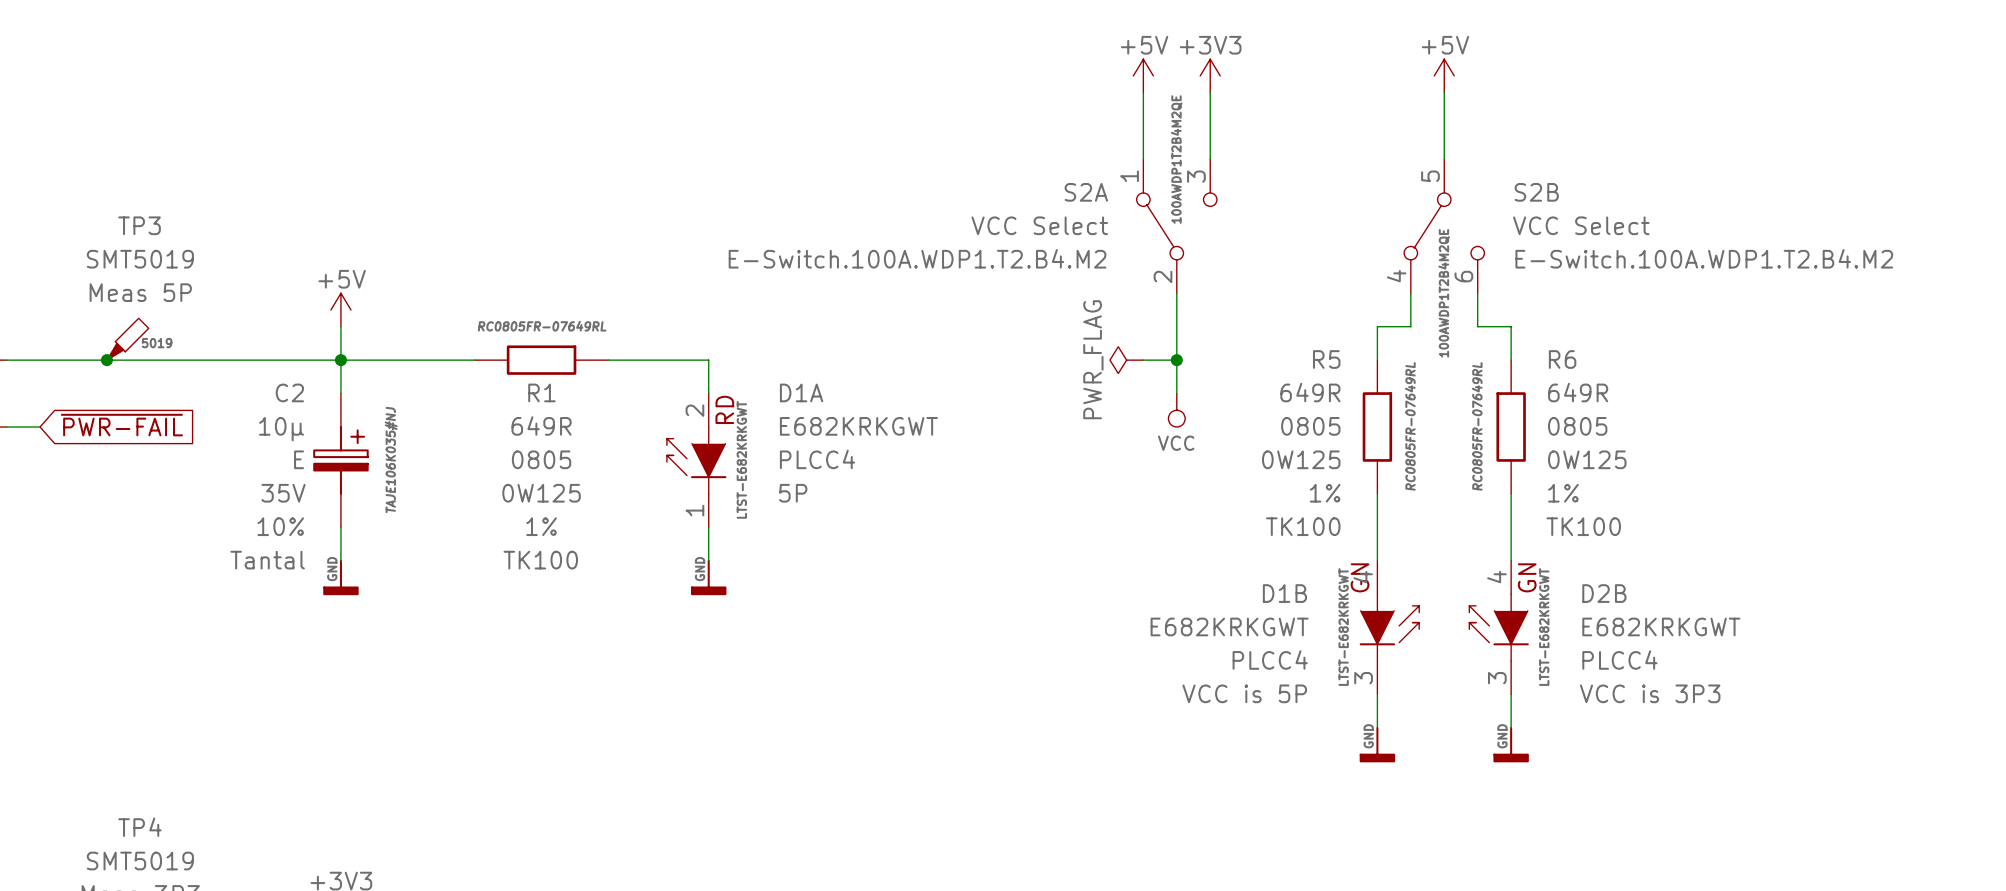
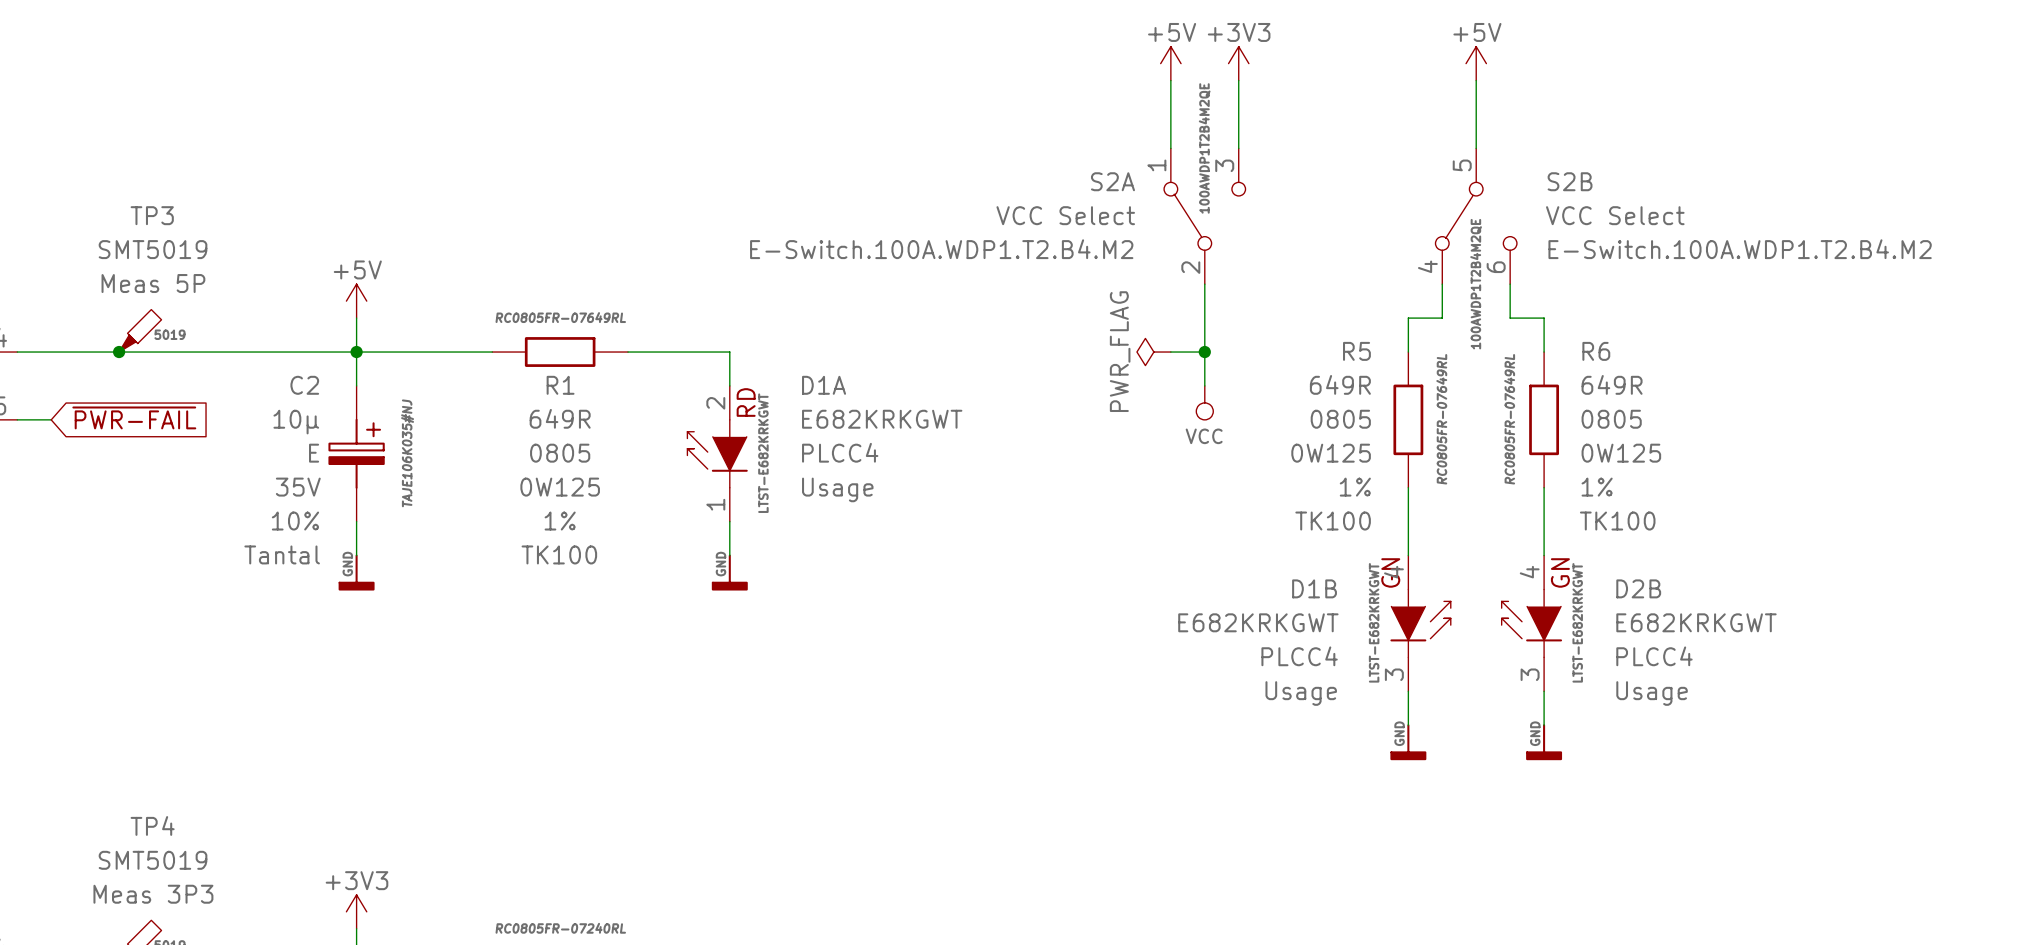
D1A text: 5P (793, 493) -> Usage (837, 489)
D1B text: VCC is 5P (1244, 693) -> Usage (1301, 693)
D2B text: VCC is 3P3 (1650, 693) -> Usage (1652, 693)

